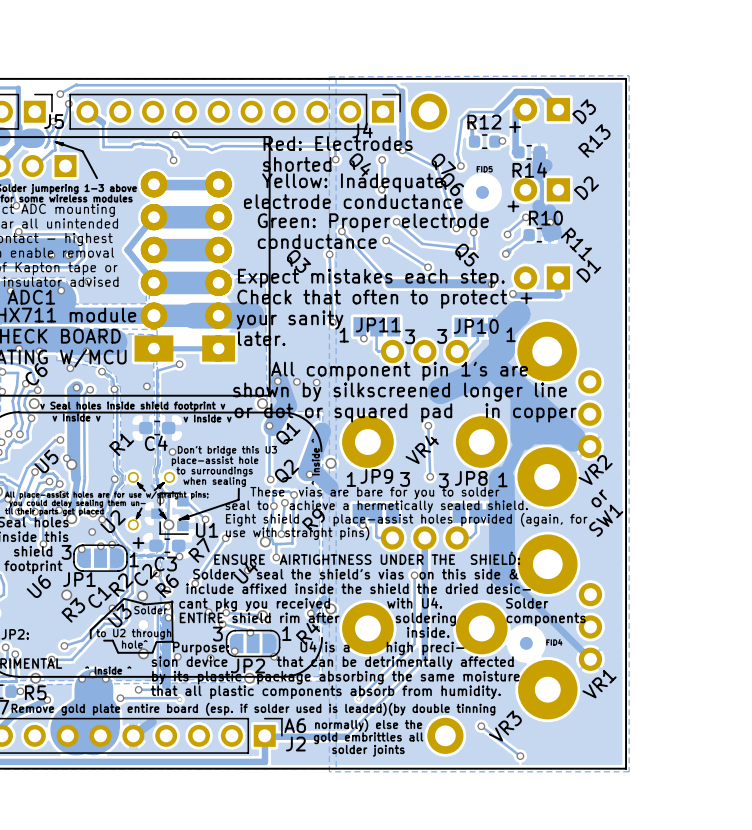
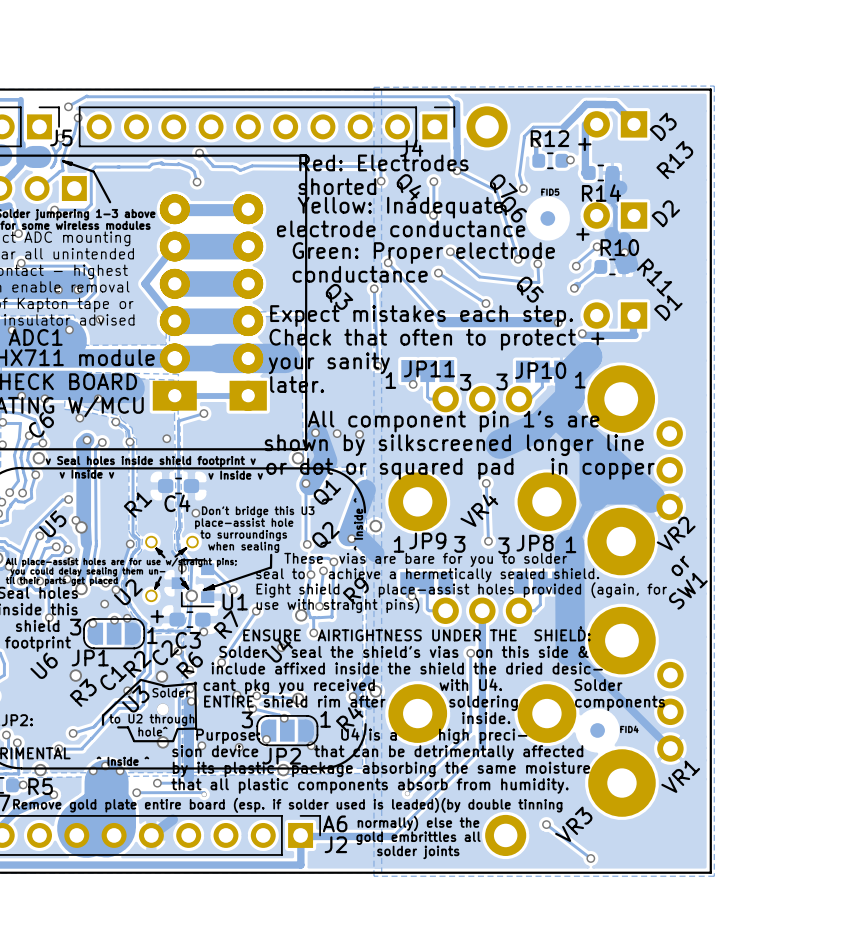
track: (87, 111) (103, 122) (103, 147) -> (54, 210) (85, 210) (91, 204) (91, 171) (95, 167) (117, 167)
via: none -> (54, 210)

